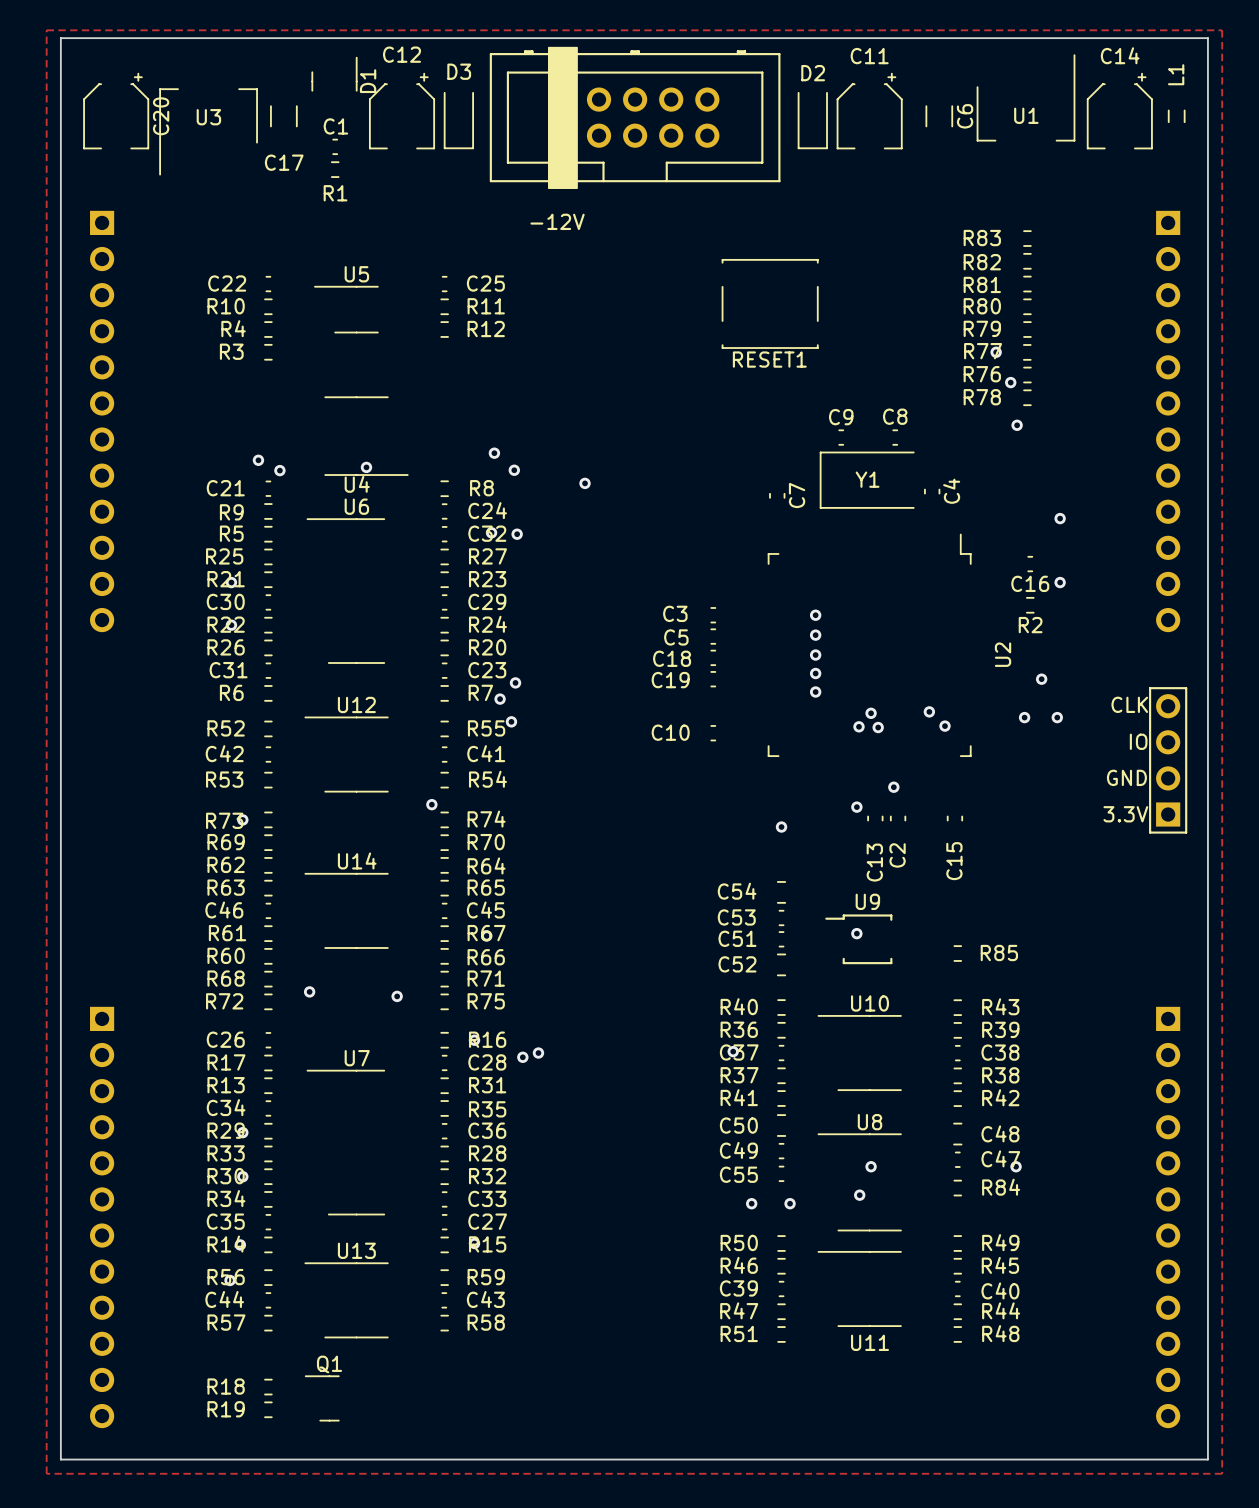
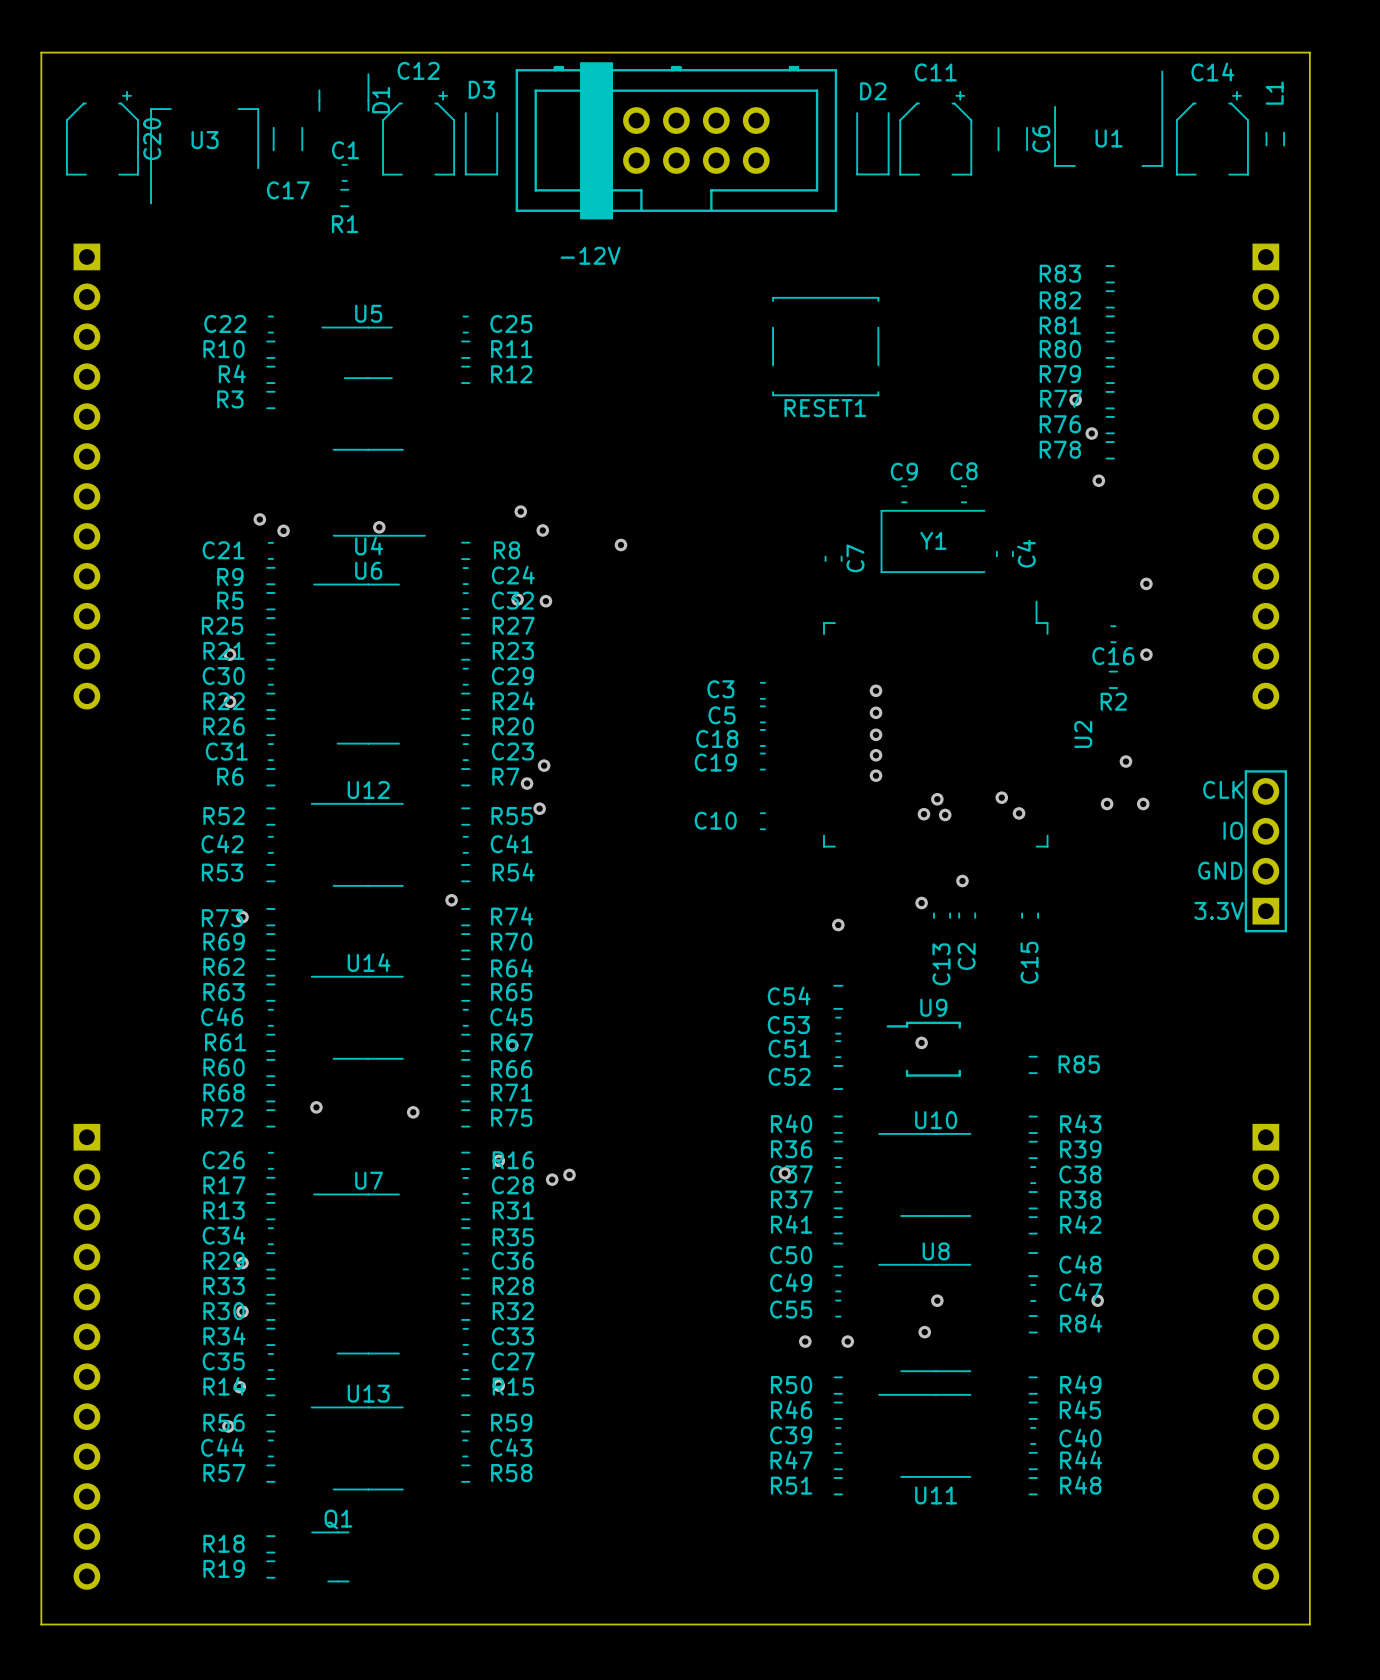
zone outline: (46, 30) (46, 1473) (1222, 1473) (1222, 30) (46, 30) -> none

